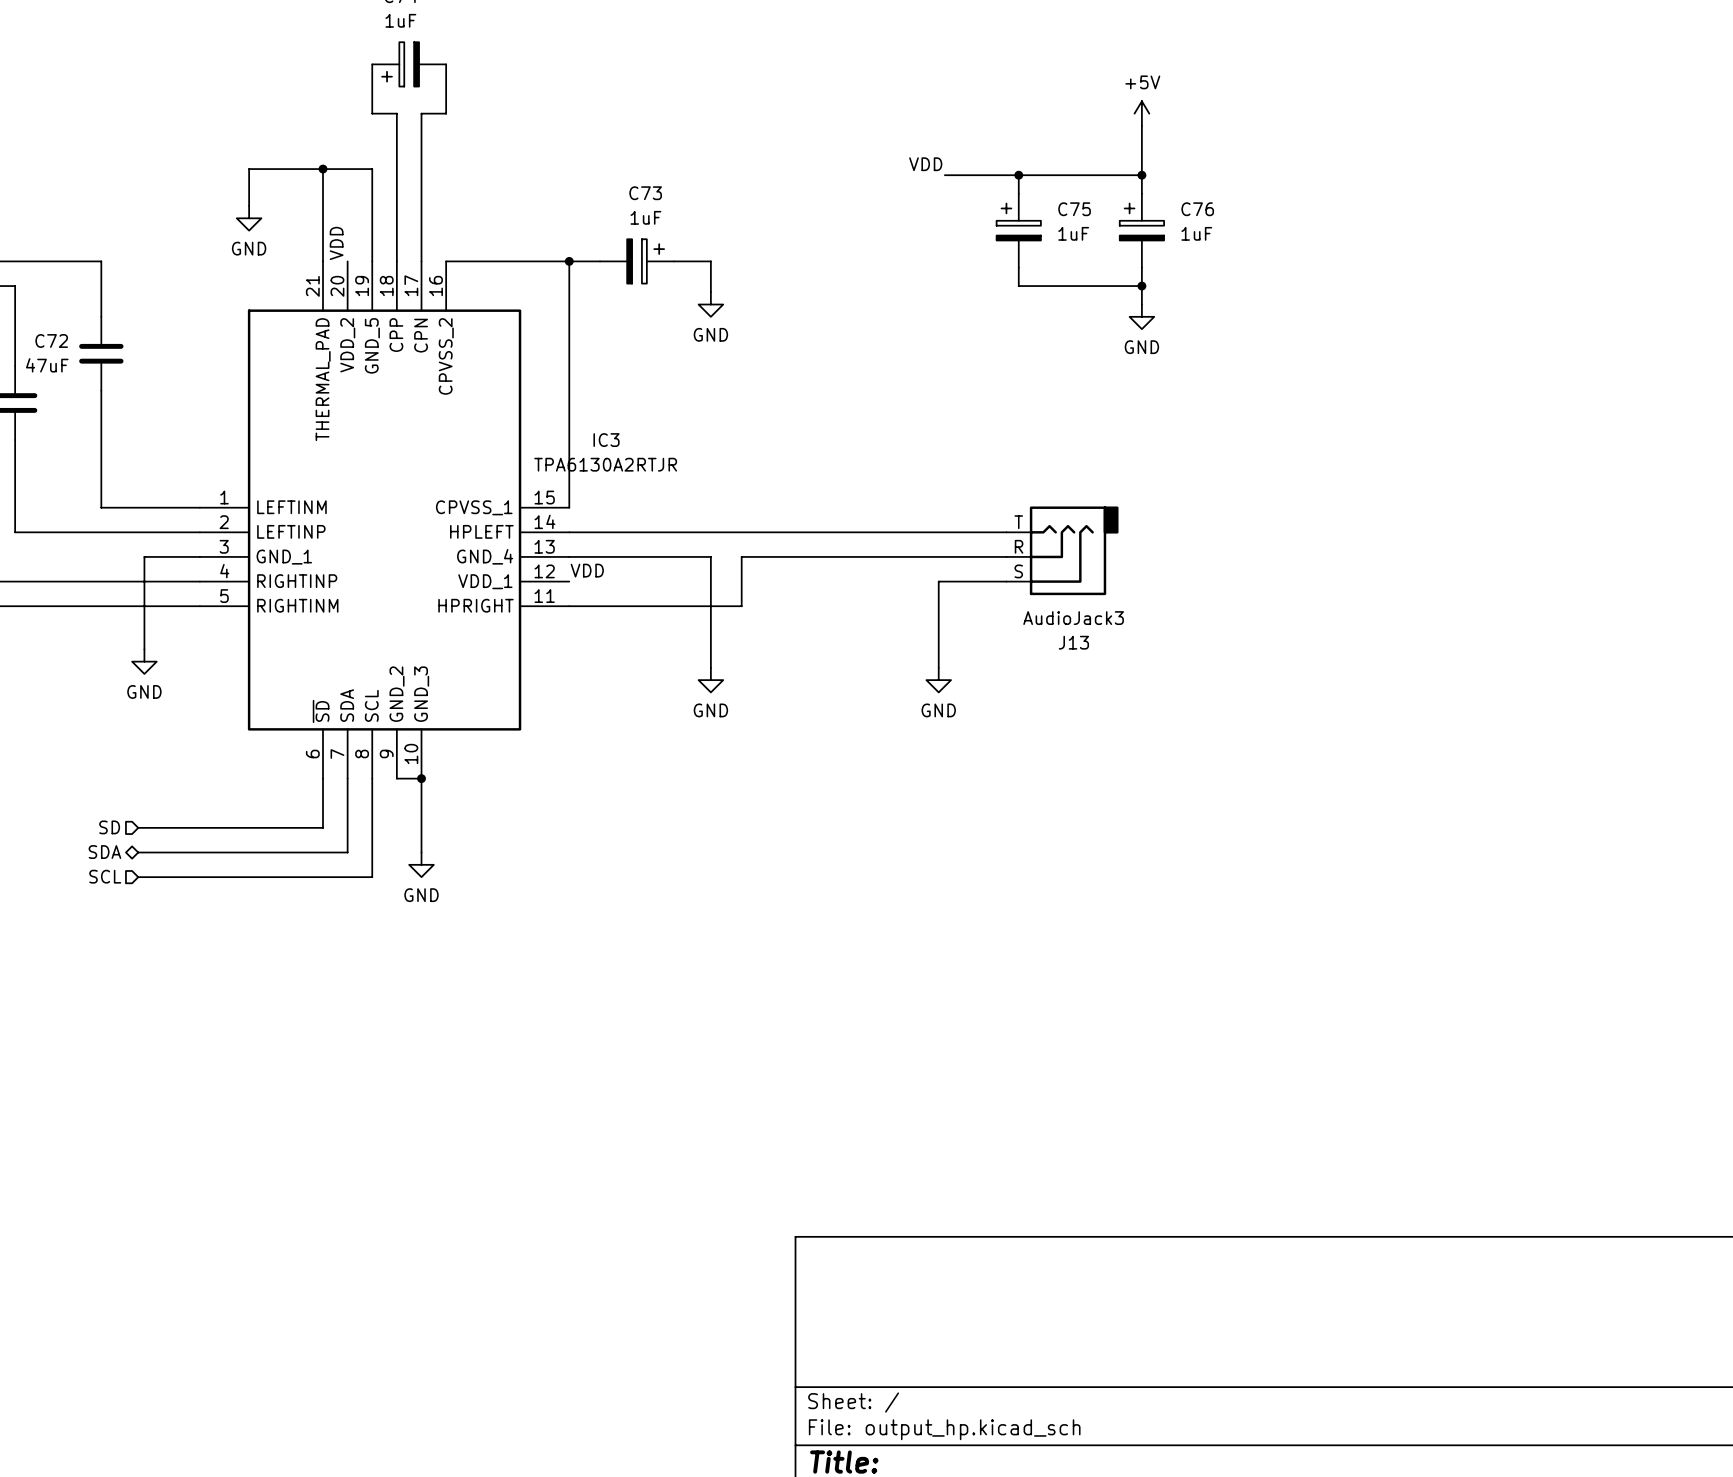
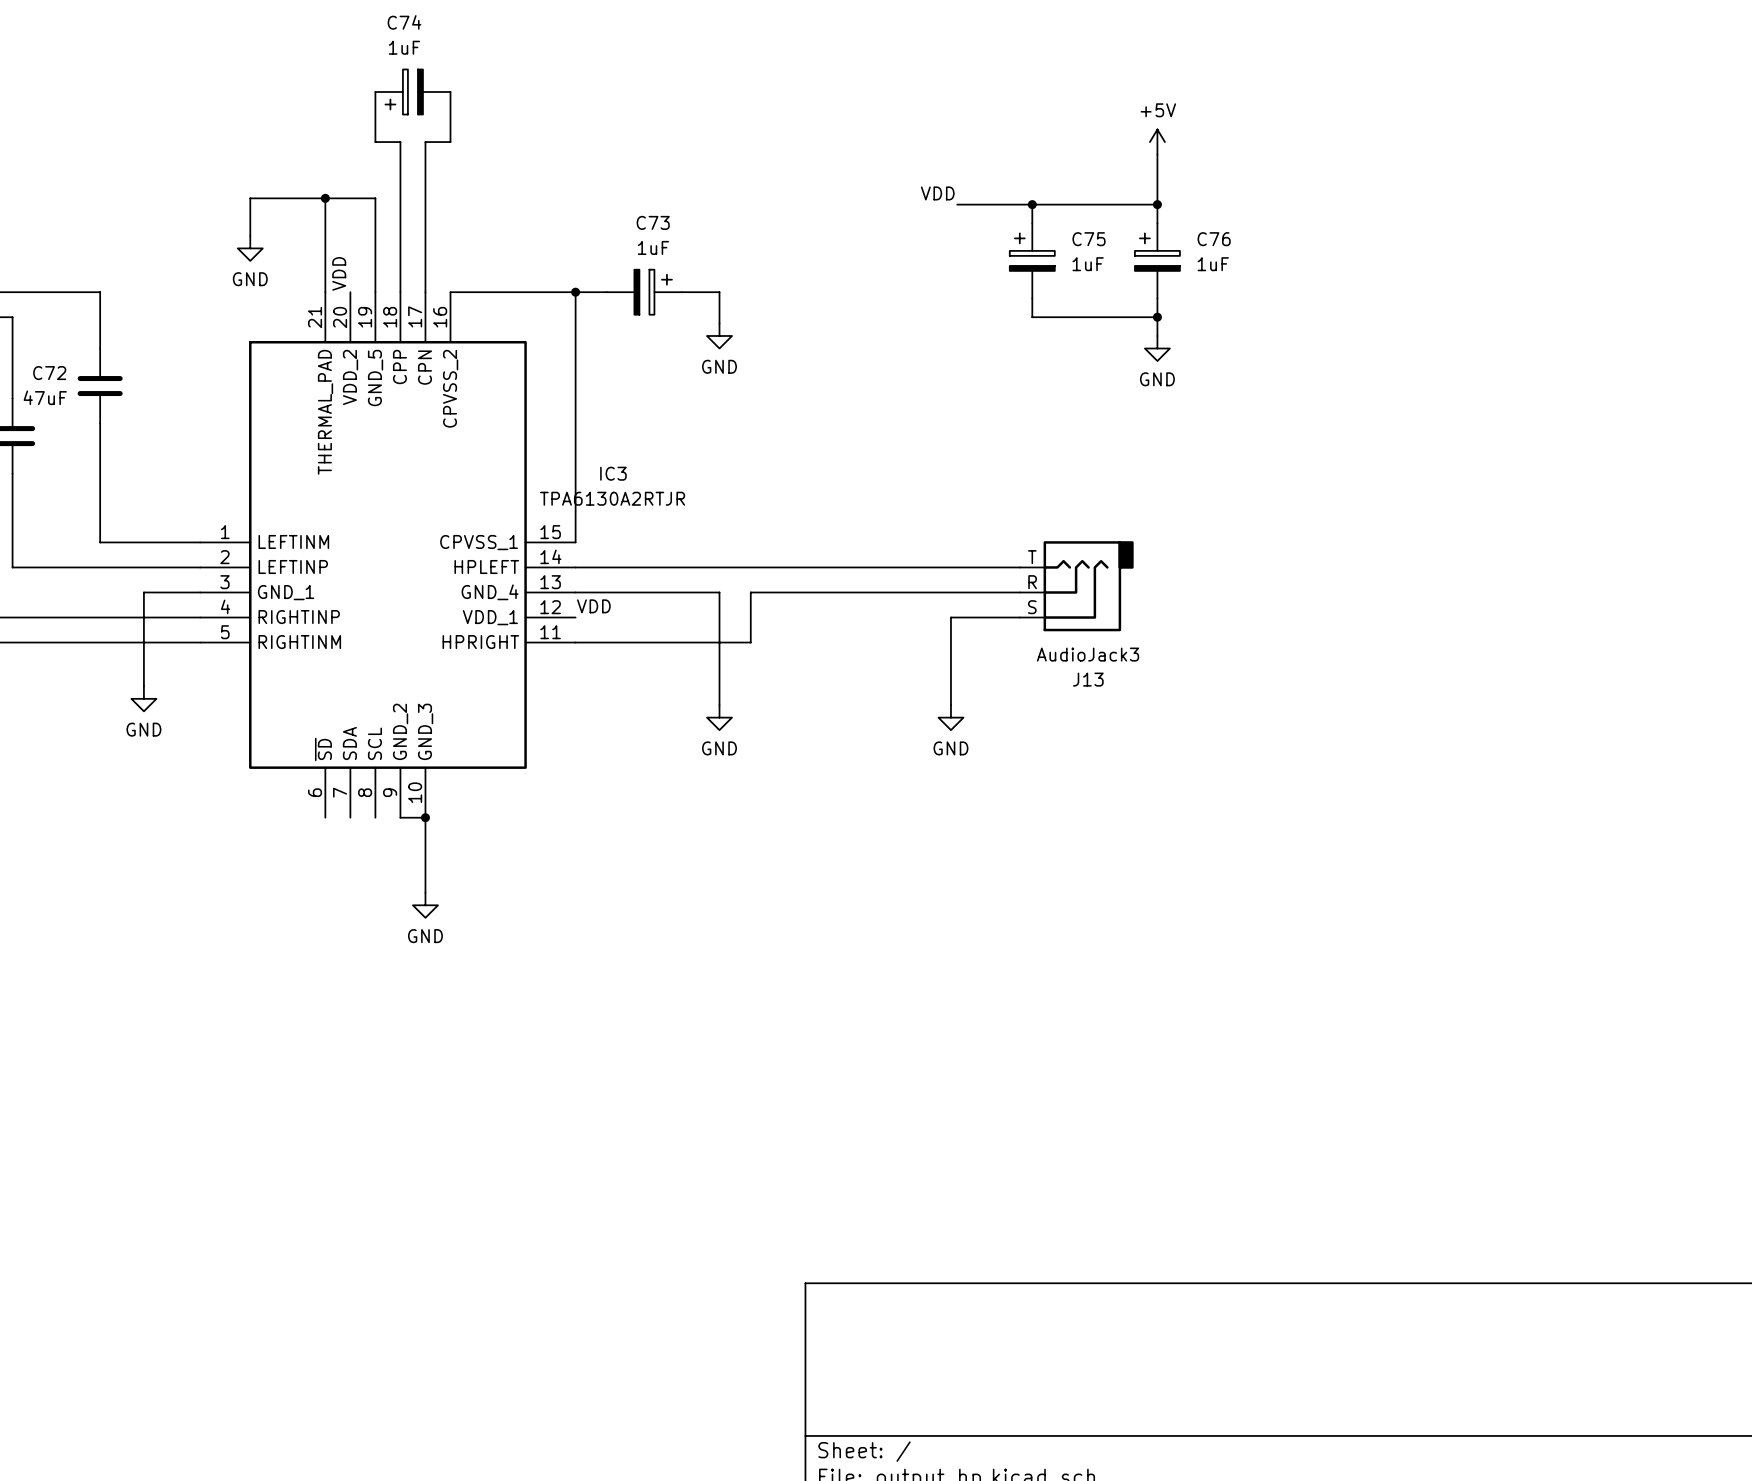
wire: (322, 778) (322, 827) (138, 827) -> none
wire: (347, 778) (347, 852) (138, 852) -> none
wire: (372, 778) (372, 877) (138, 877) -> none
hierarchical label: SD (109, 827) -> none
hierarchical label: SDA (104, 852) -> none
hierarchical label: SCL (105, 876) -> none

